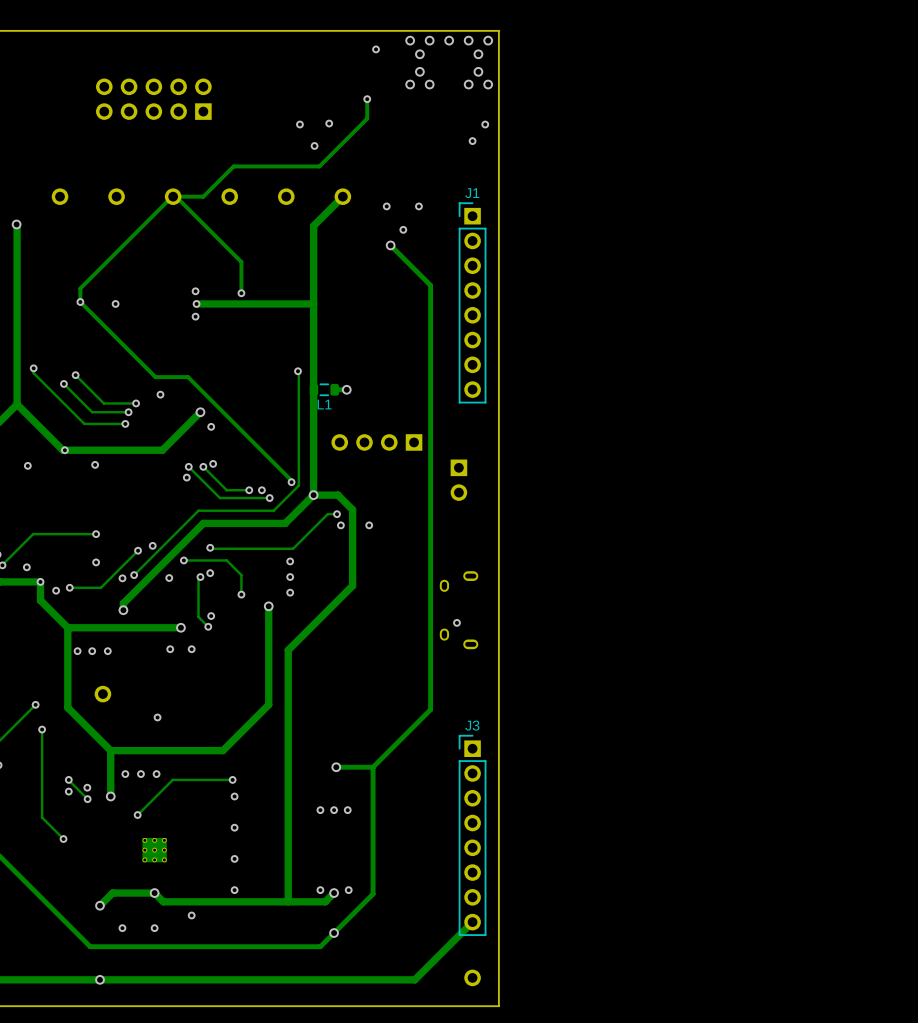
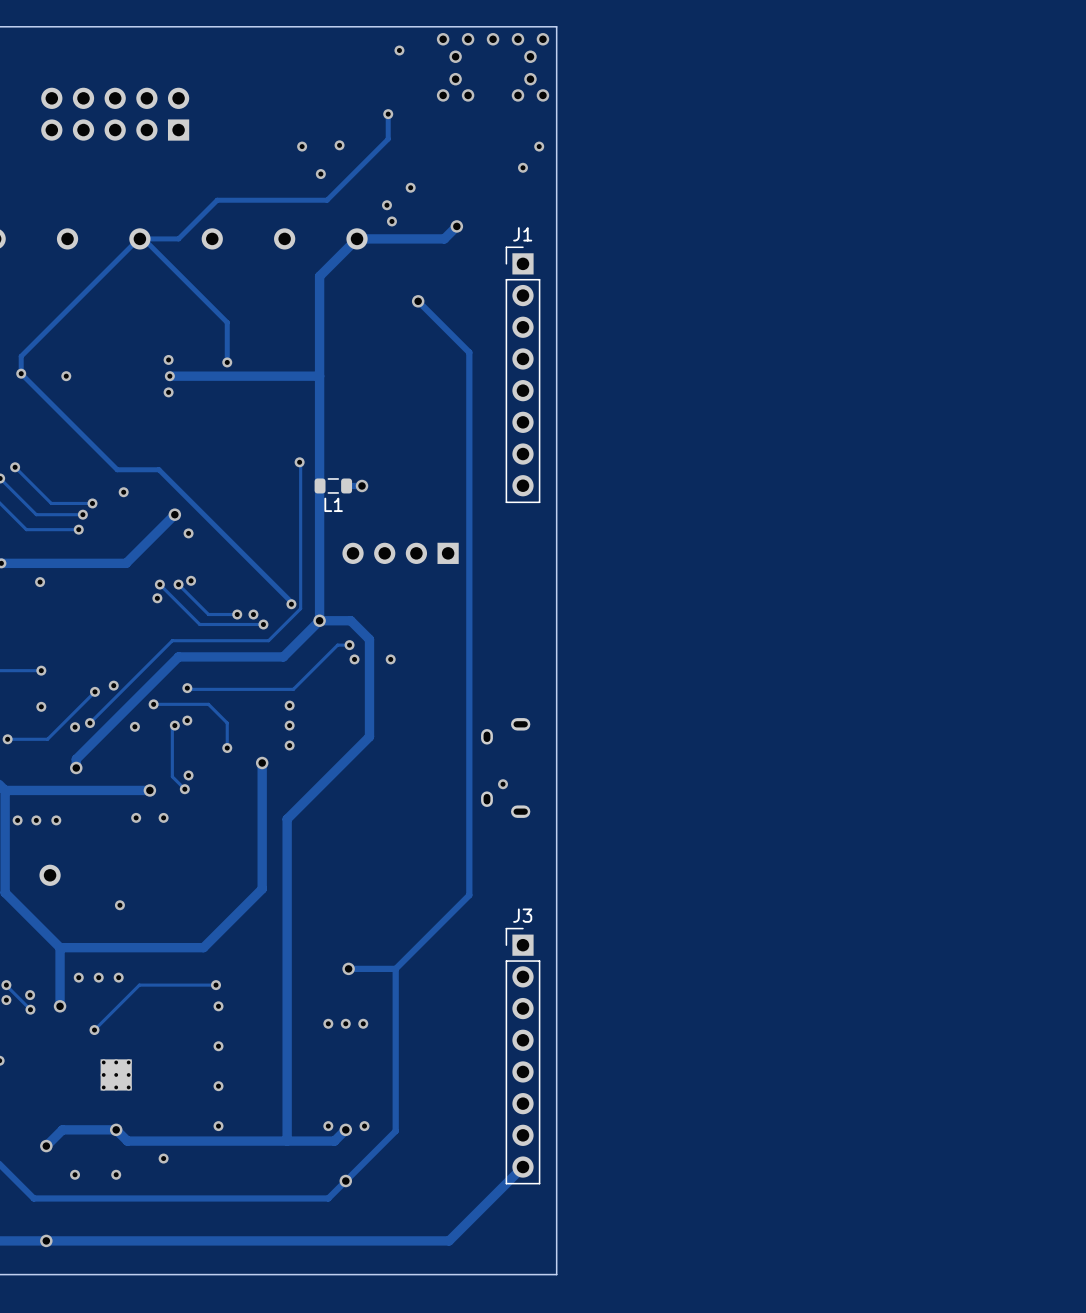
via: none -> (410, 187)
via: none -> (386, 205)
via: none -> (391, 221)
track: none -> (456, 226) (444, 238) (357, 238)
via: none -> (456, 226)
via: (386, 206) -> none
via: (418, 206) -> none
via: (403, 229) -> none
part: (458, 480) -> none
part: (472, 977) -> none

